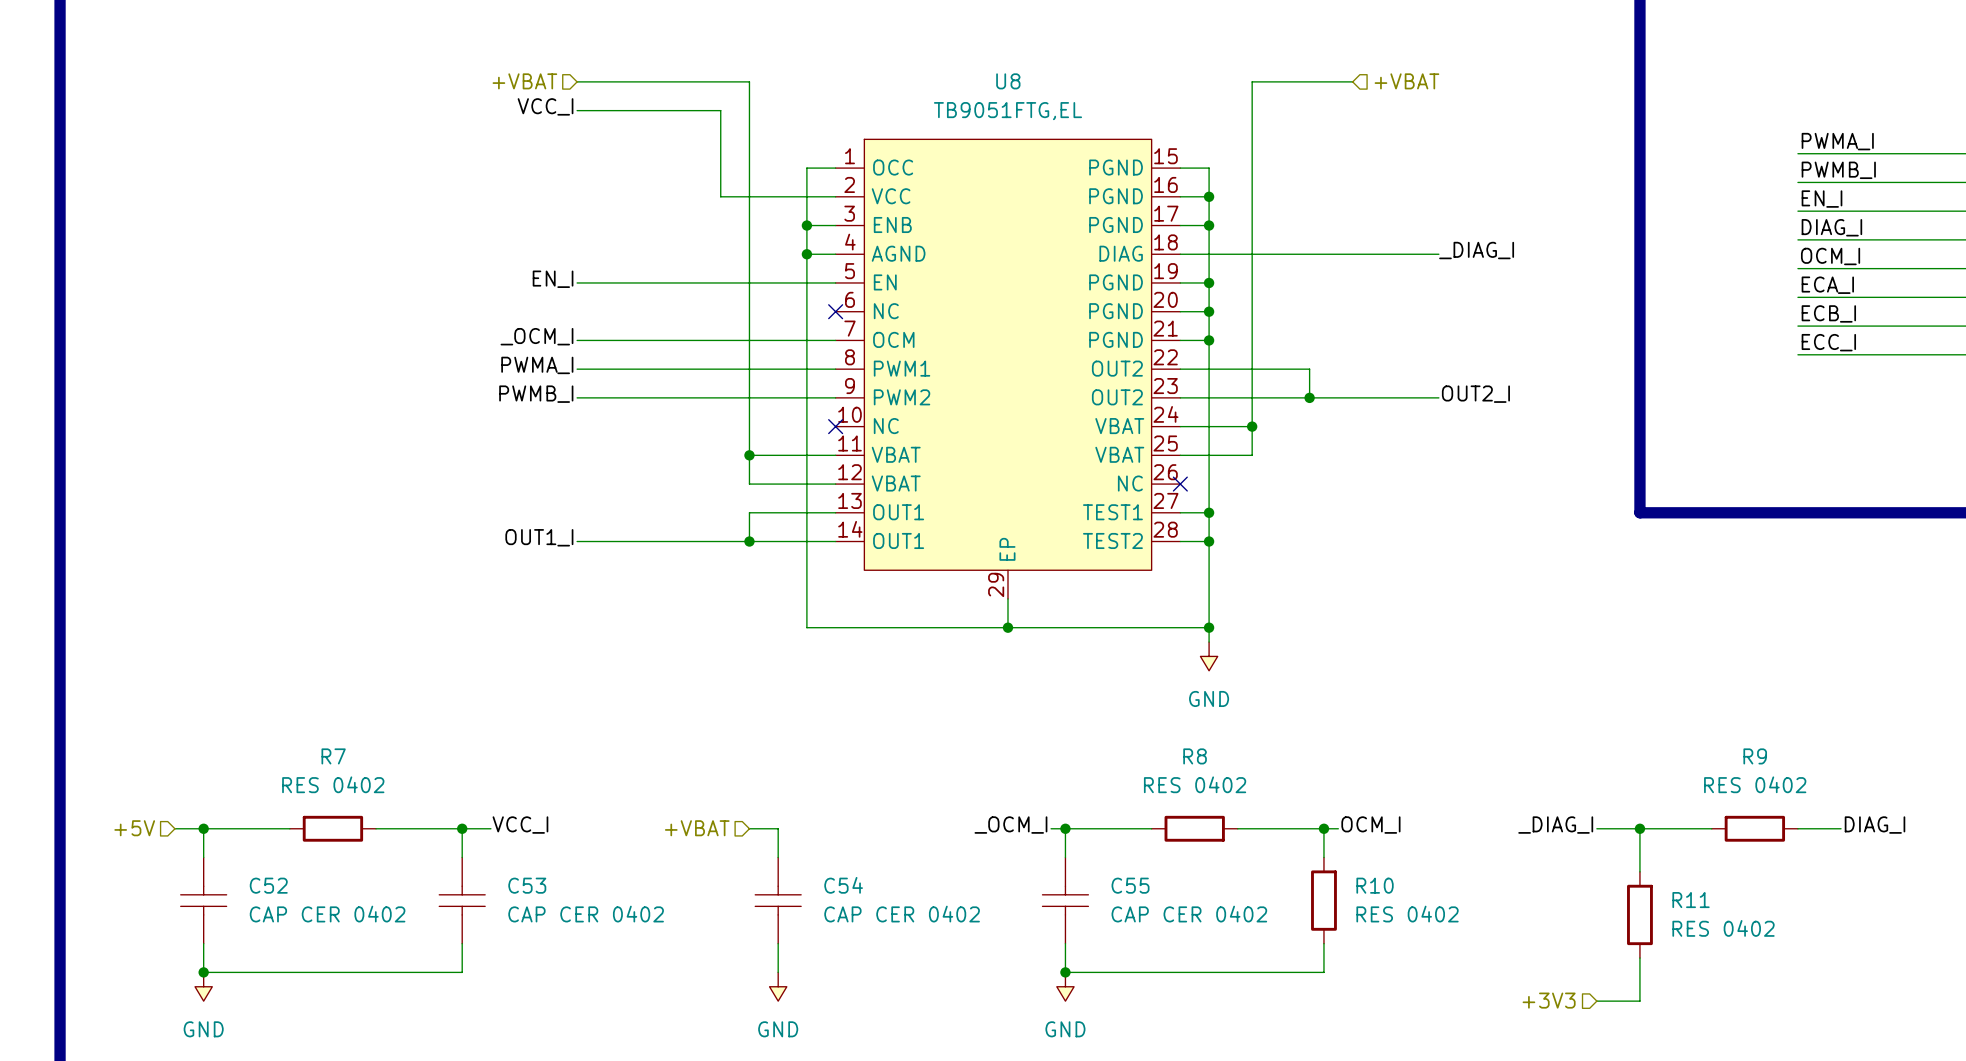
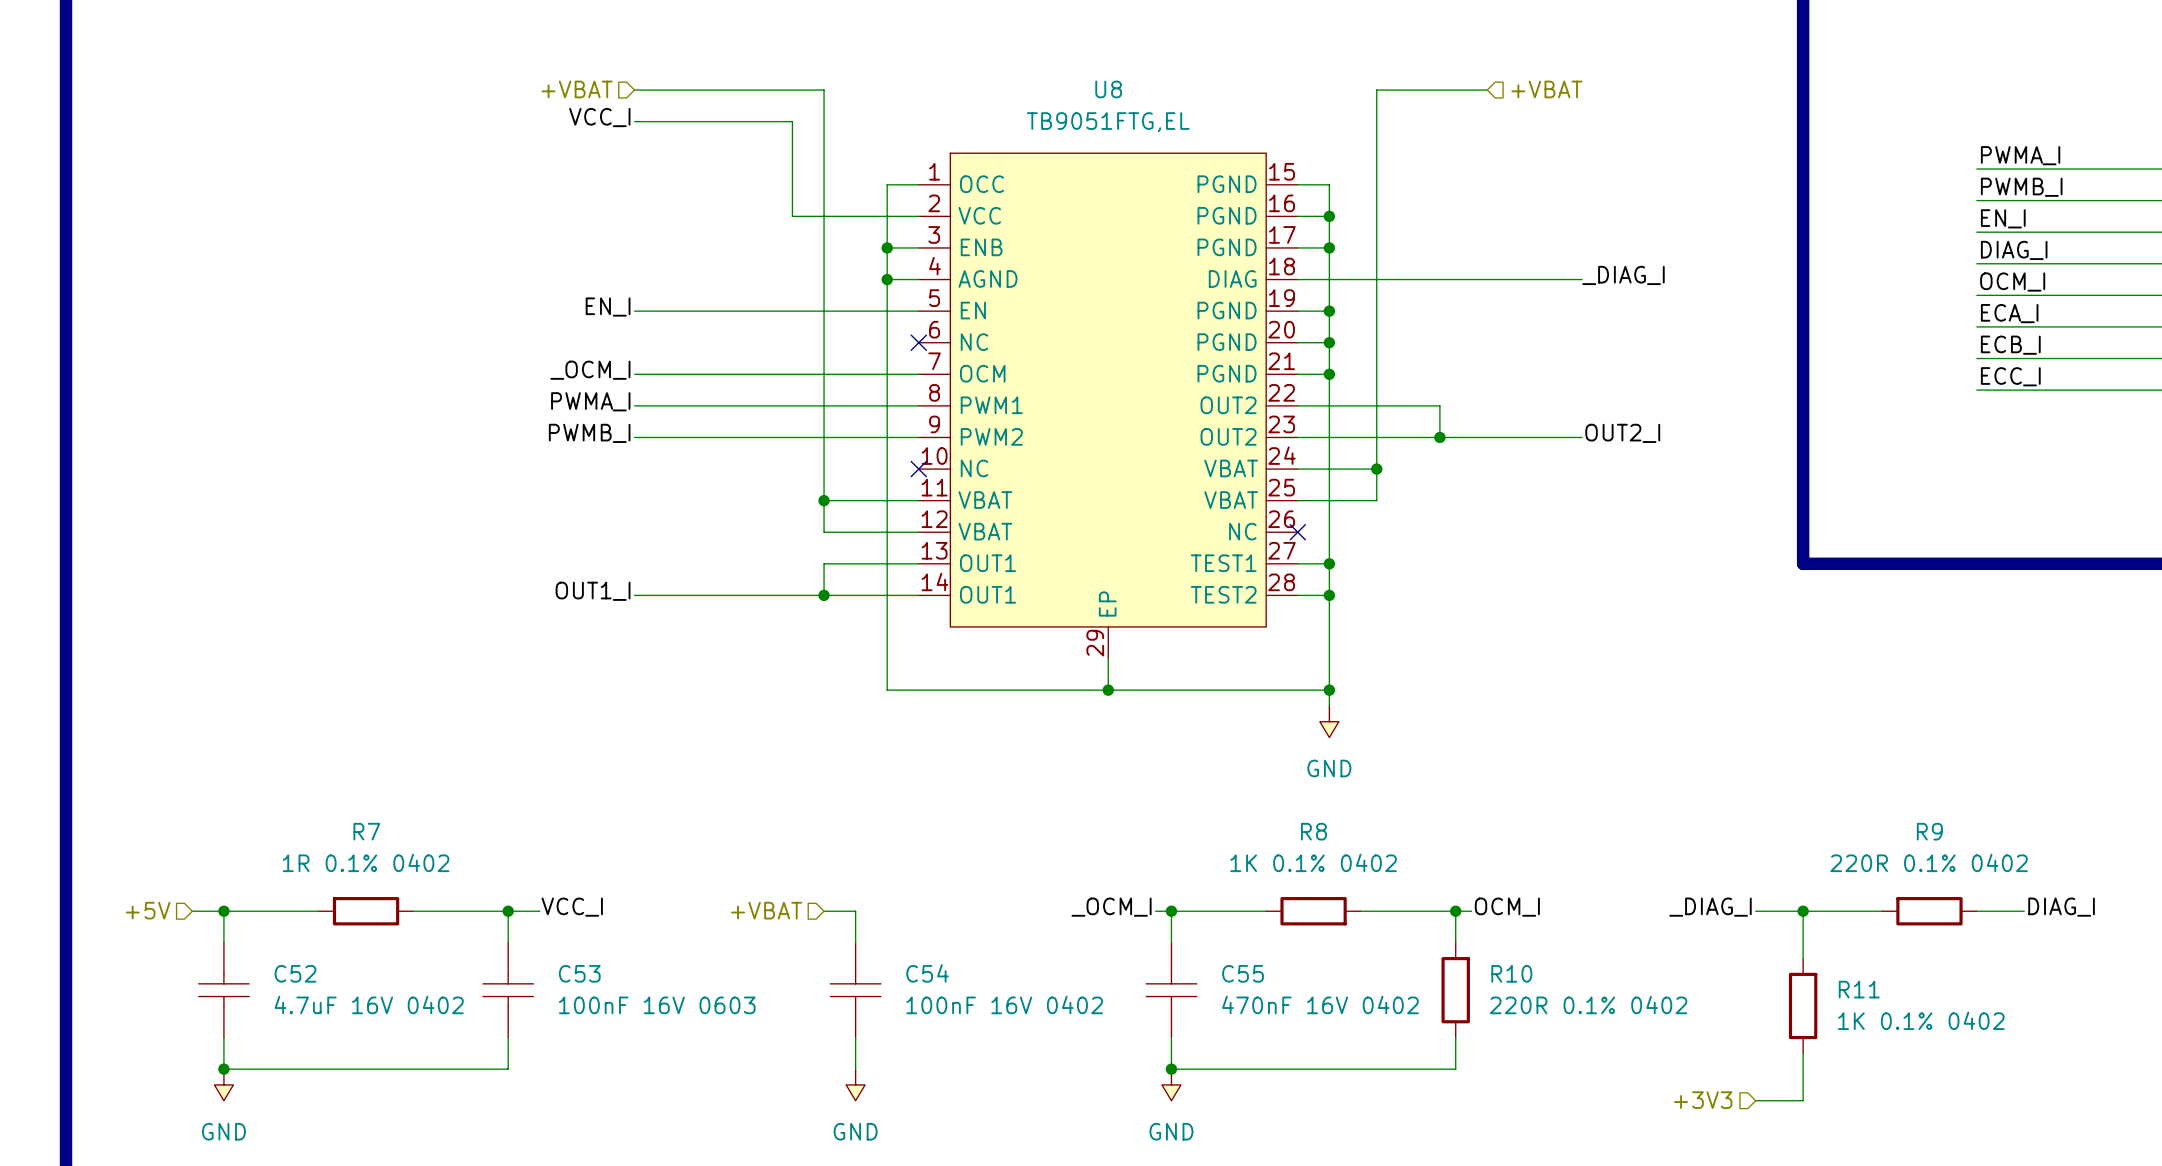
R7 value: RES 0402 (333, 784) -> 1R 0.1% 0402 (366, 862)
R8 value: RES 0402 (1195, 784) -> 1K 0.1% 0402 (1313, 862)
R9 value: RES 0402 (1755, 784) -> 220R 0.1% 0402 (1929, 862)
C52 value: CAP CER 0402 (327, 914) -> 4.7uF 16V 0402 (369, 1005)
C53 value: CAP CER 0402 (586, 914) -> 100nF 16V 0603 (657, 1005)
C54 value: CAP CER 0402 (902, 914) -> 100nF 16V 0402 (1004, 1005)
C55 value: CAP CER 0402 (1189, 914) -> 470nF 16V 0402 (1320, 1005)
R10 value: RES 0402 (1407, 914) -> 220R 0.1% 0402 (1588, 1005)
R11 value: RES 0402 (1723, 928) -> 1K 0.1% 0402 (1921, 1020)

